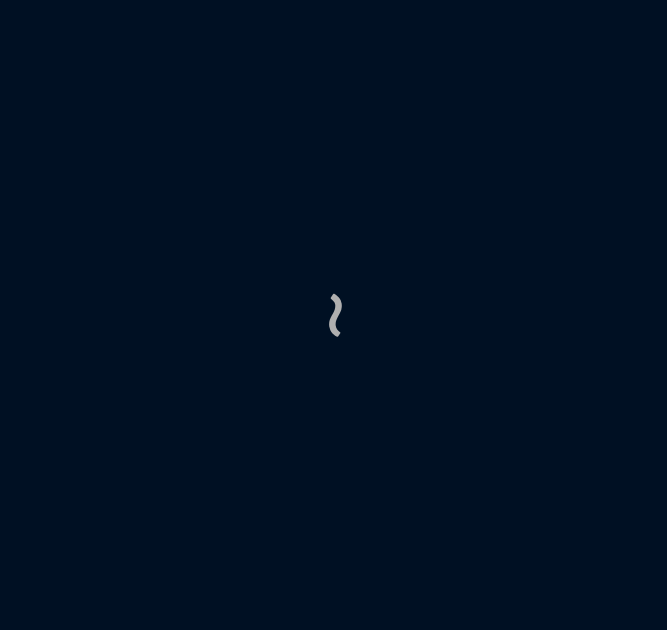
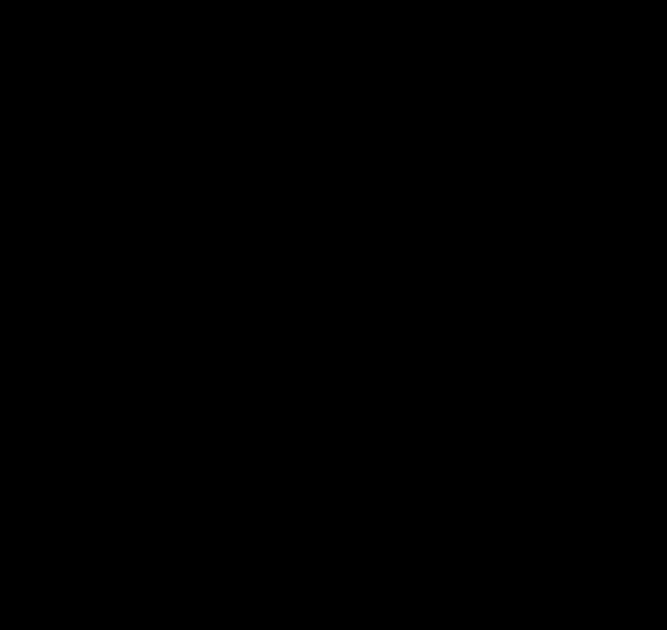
text: ~ (335, 315) -> none

